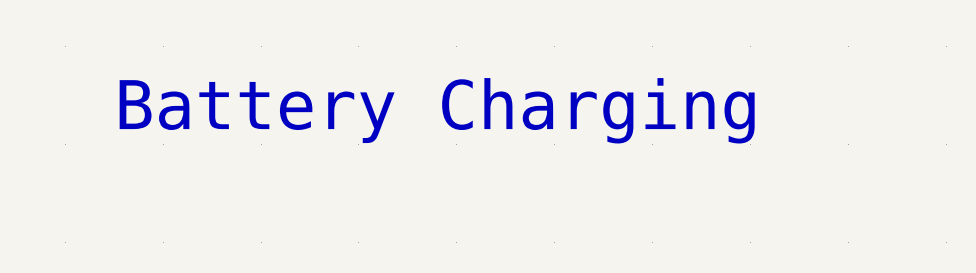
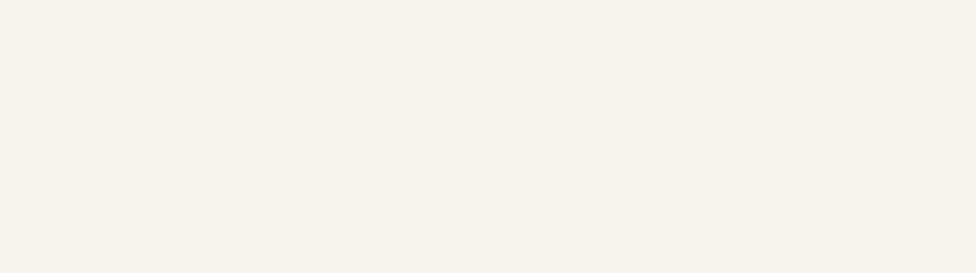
text: Battery Charging (437, 110) -> none

